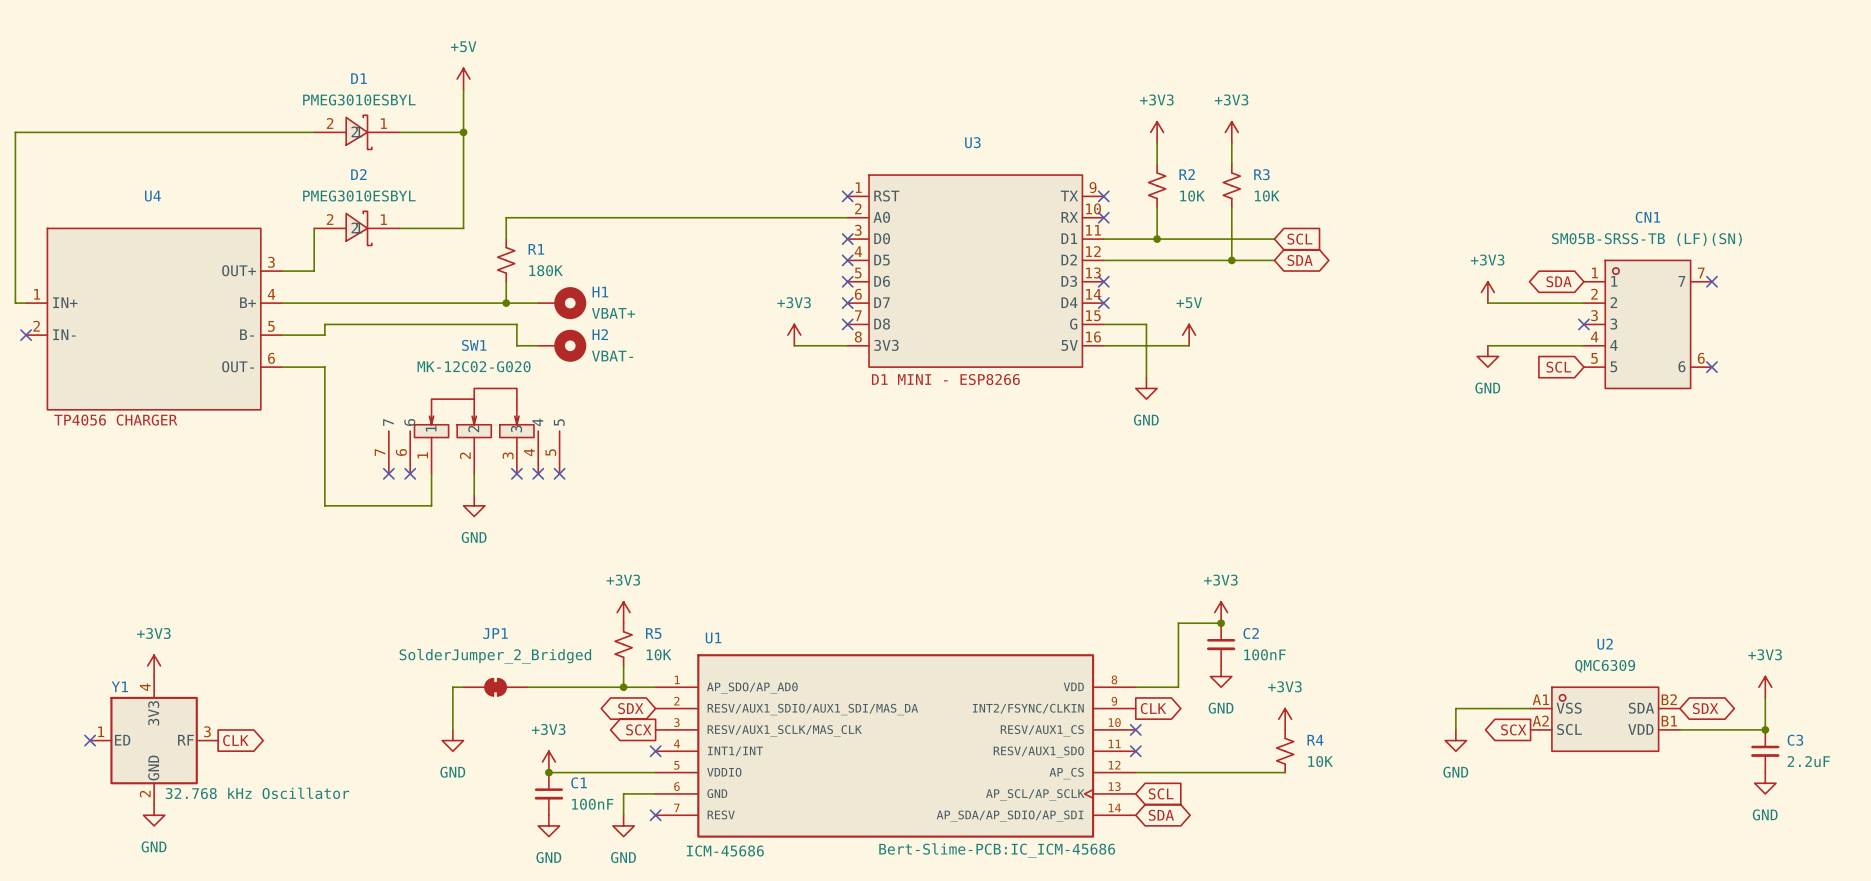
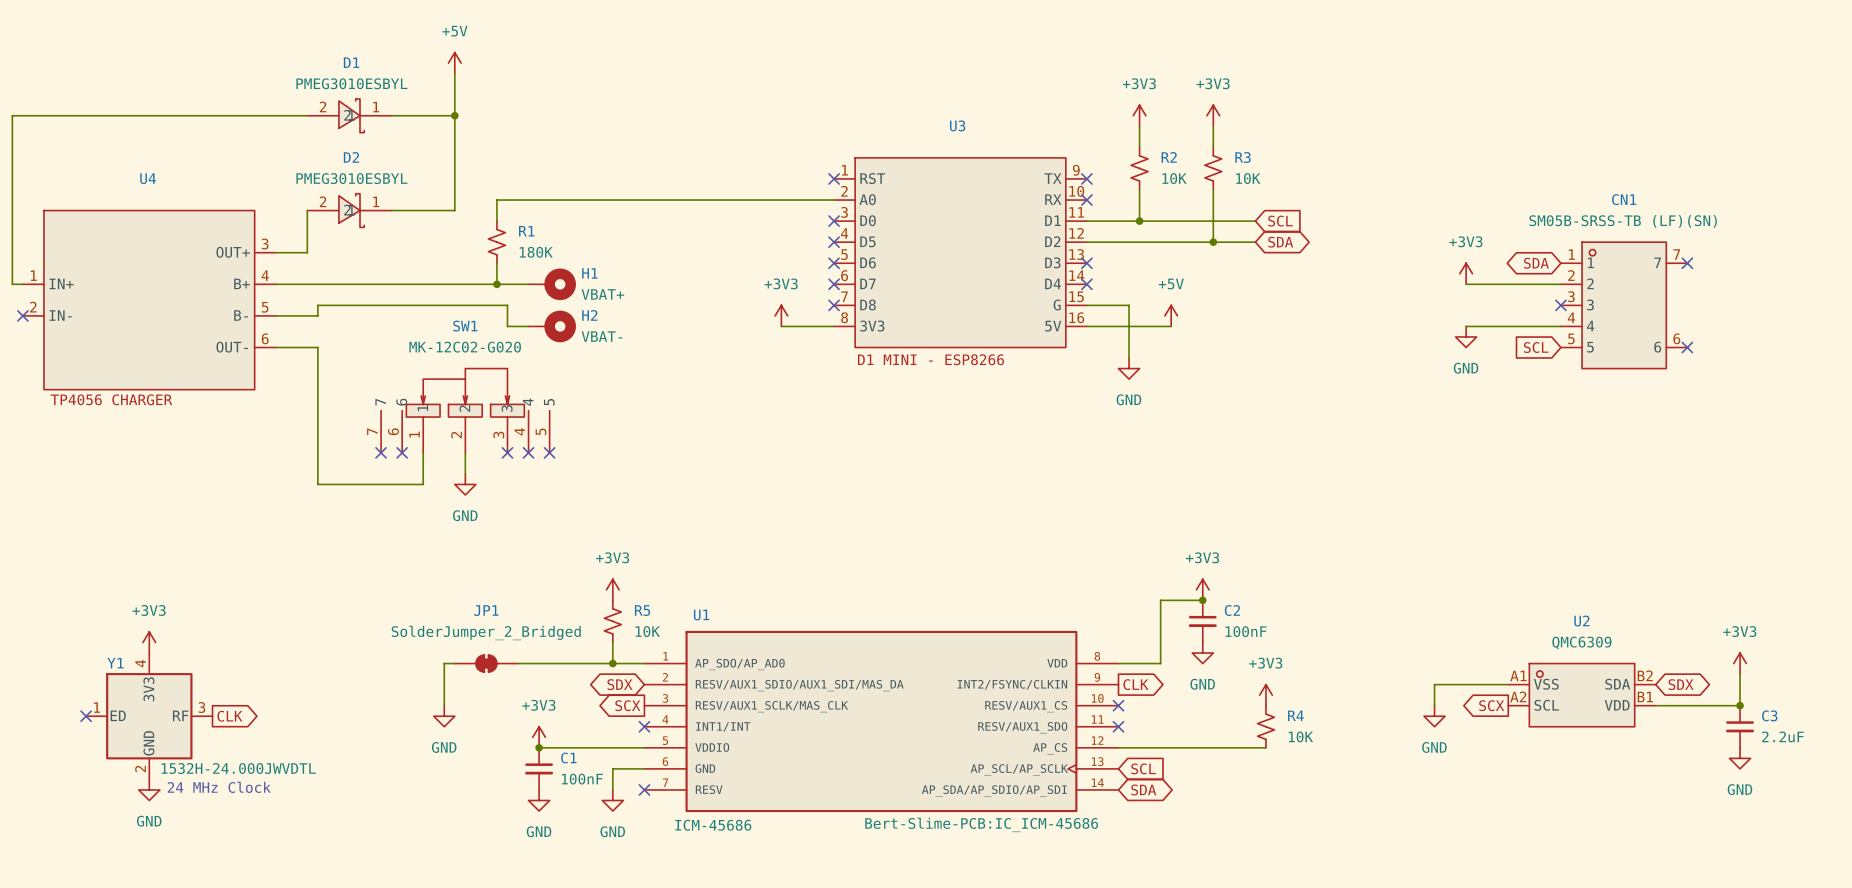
Y1 value: 32.768 kHz Oscillator (257, 793) -> 1532H-24.000JWVDTL (238, 768)
text: none -> 24 MHz Clock (219, 787)

